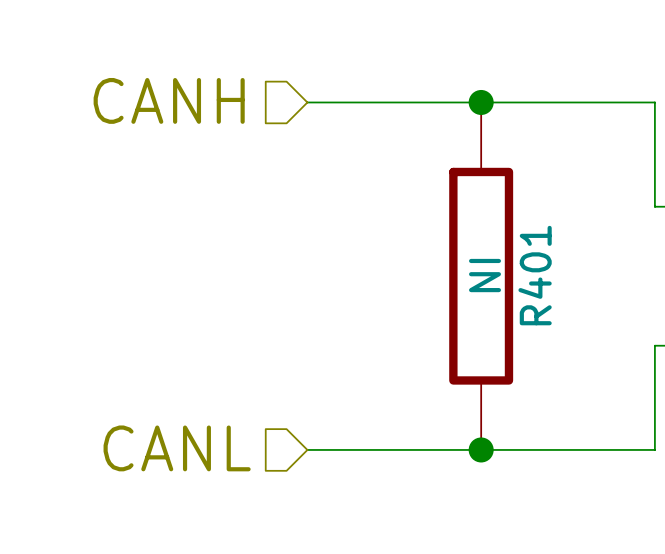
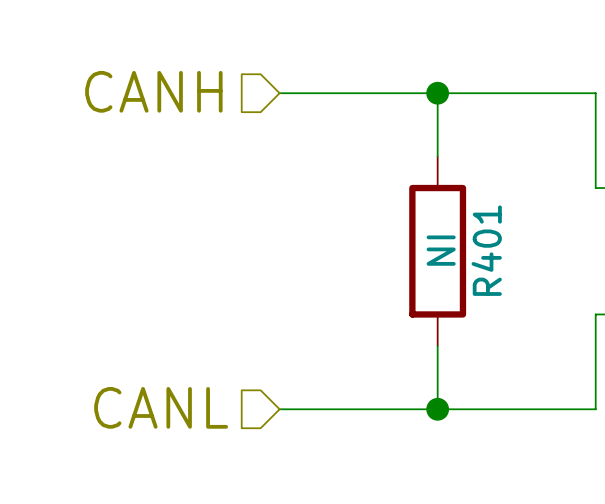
R401 symbol: [449, 102, 514, 450] -> [409, 156, 467, 347]

